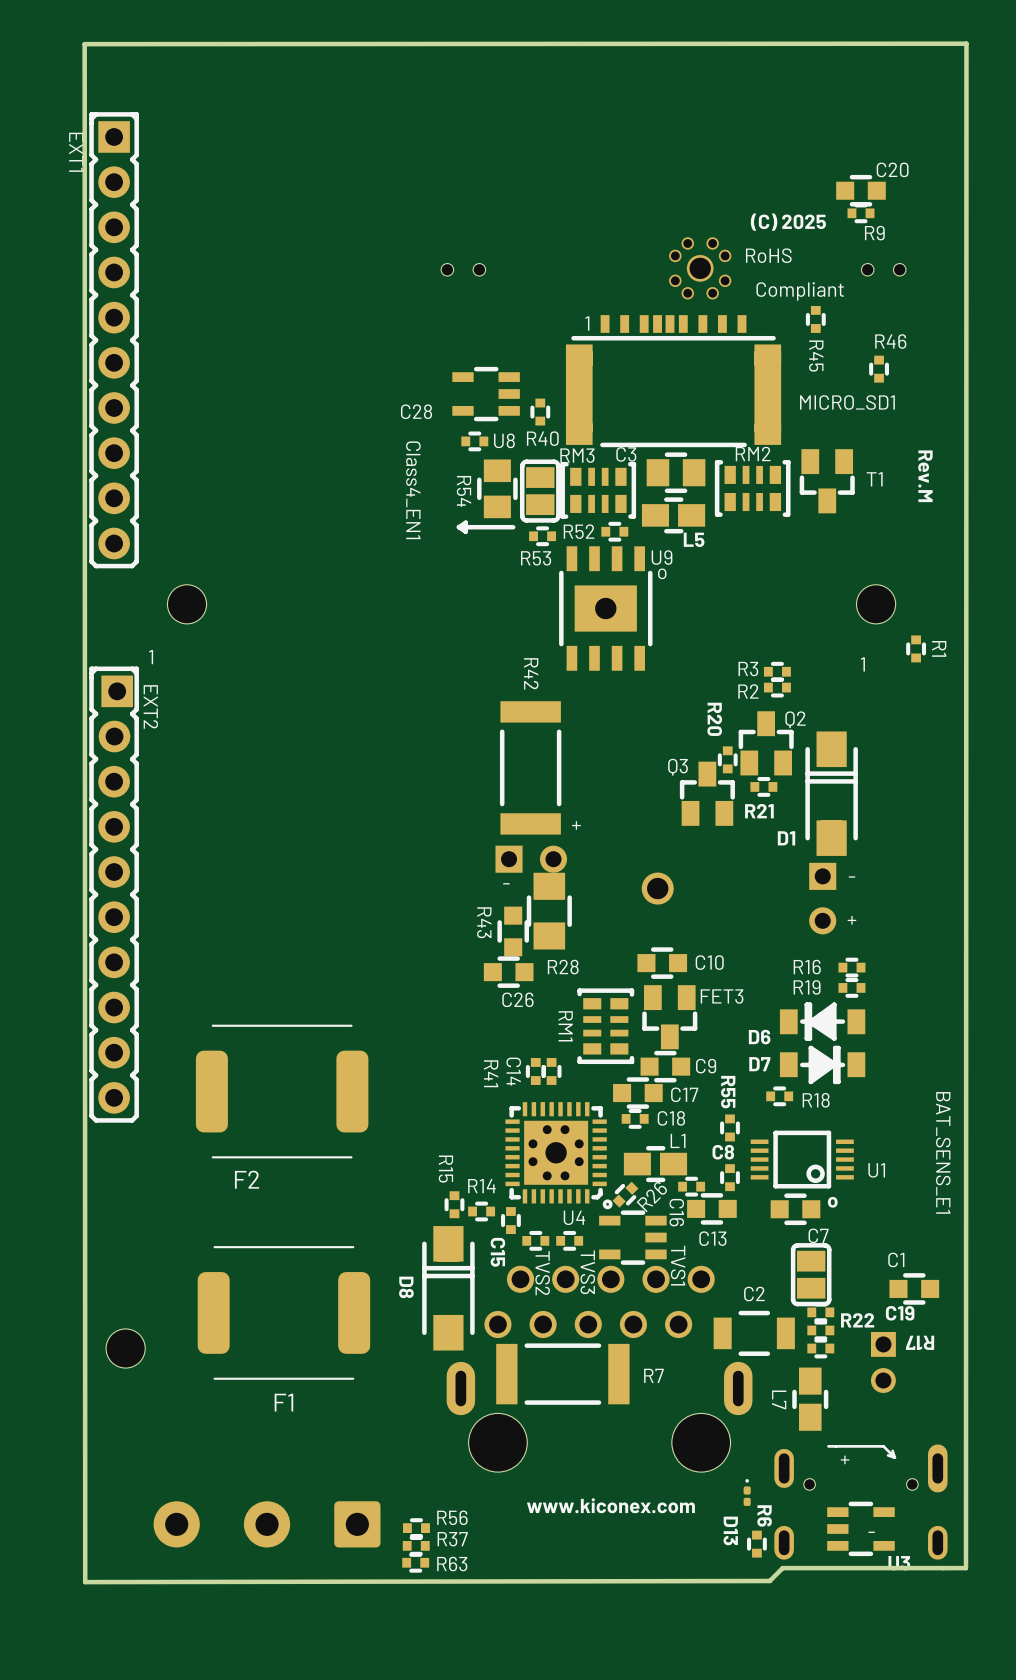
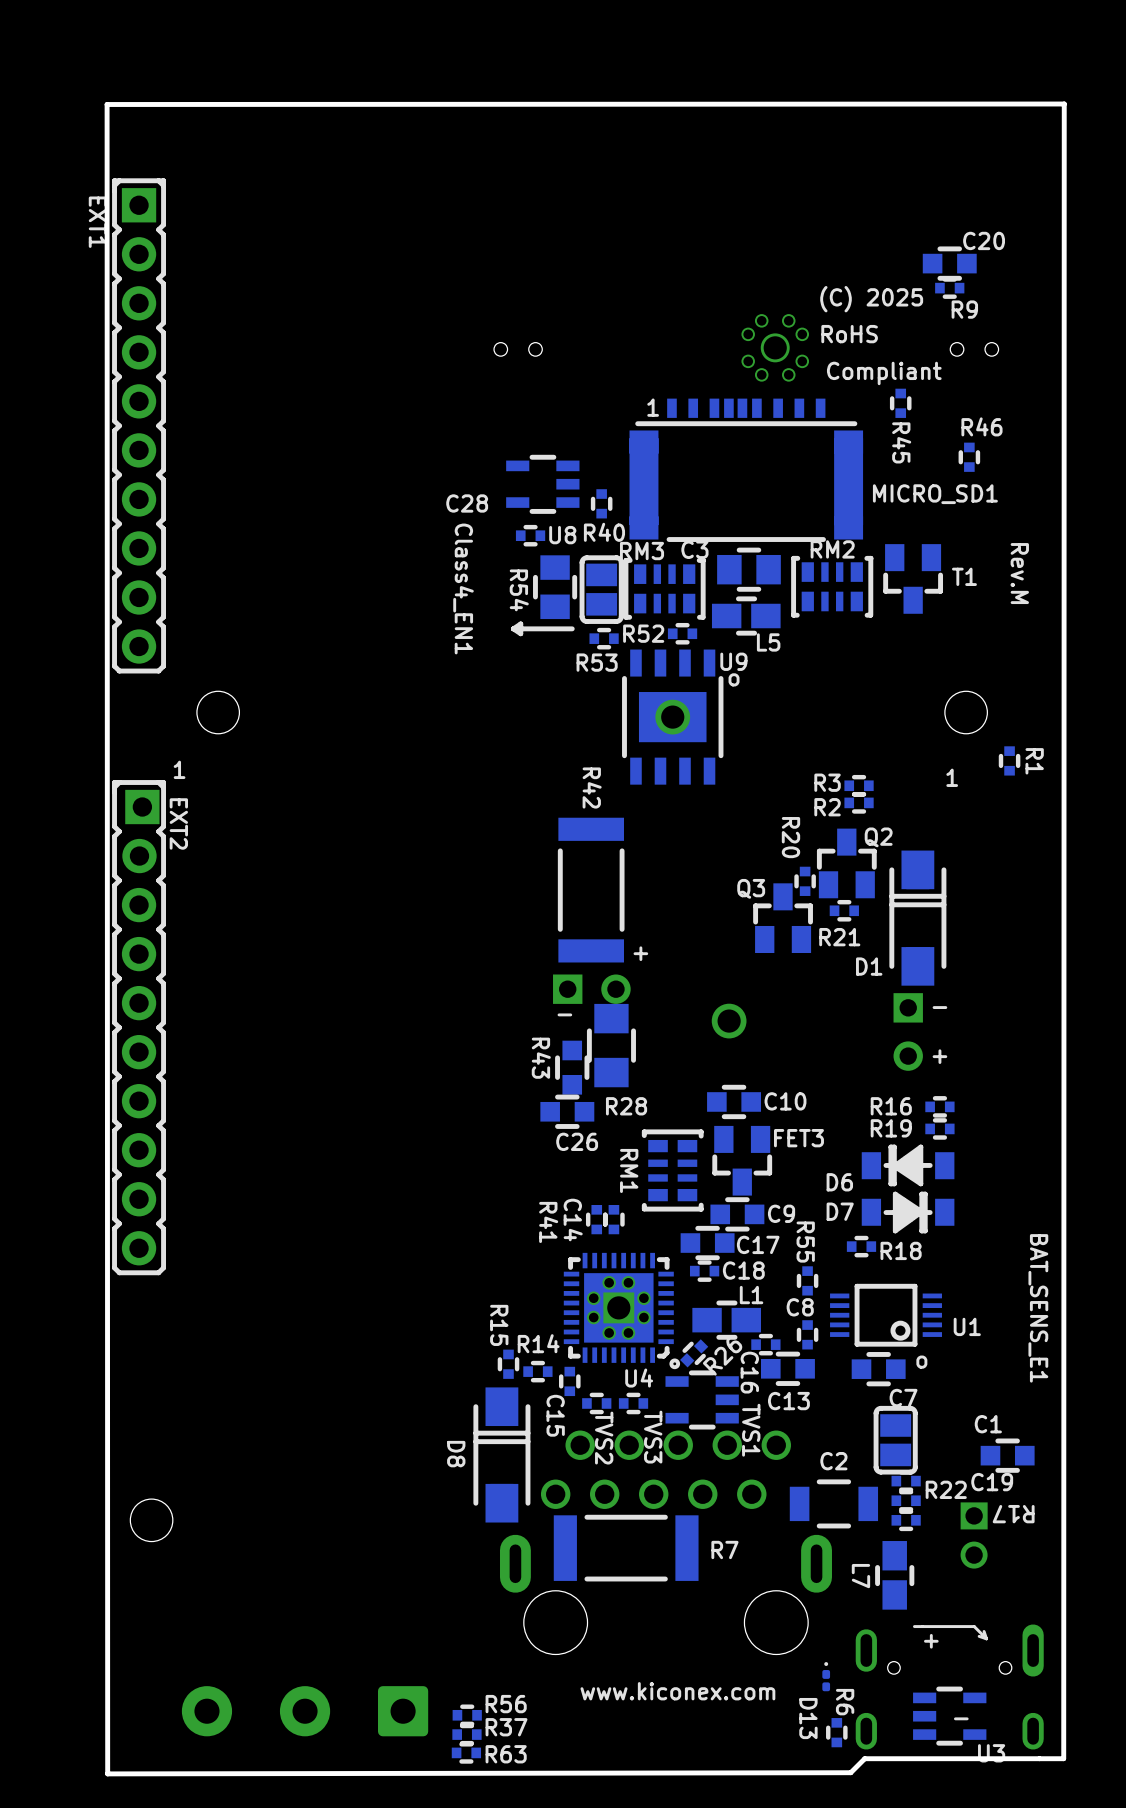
F2: (282, 1091) -> none
F1: (283, 1312) -> none

